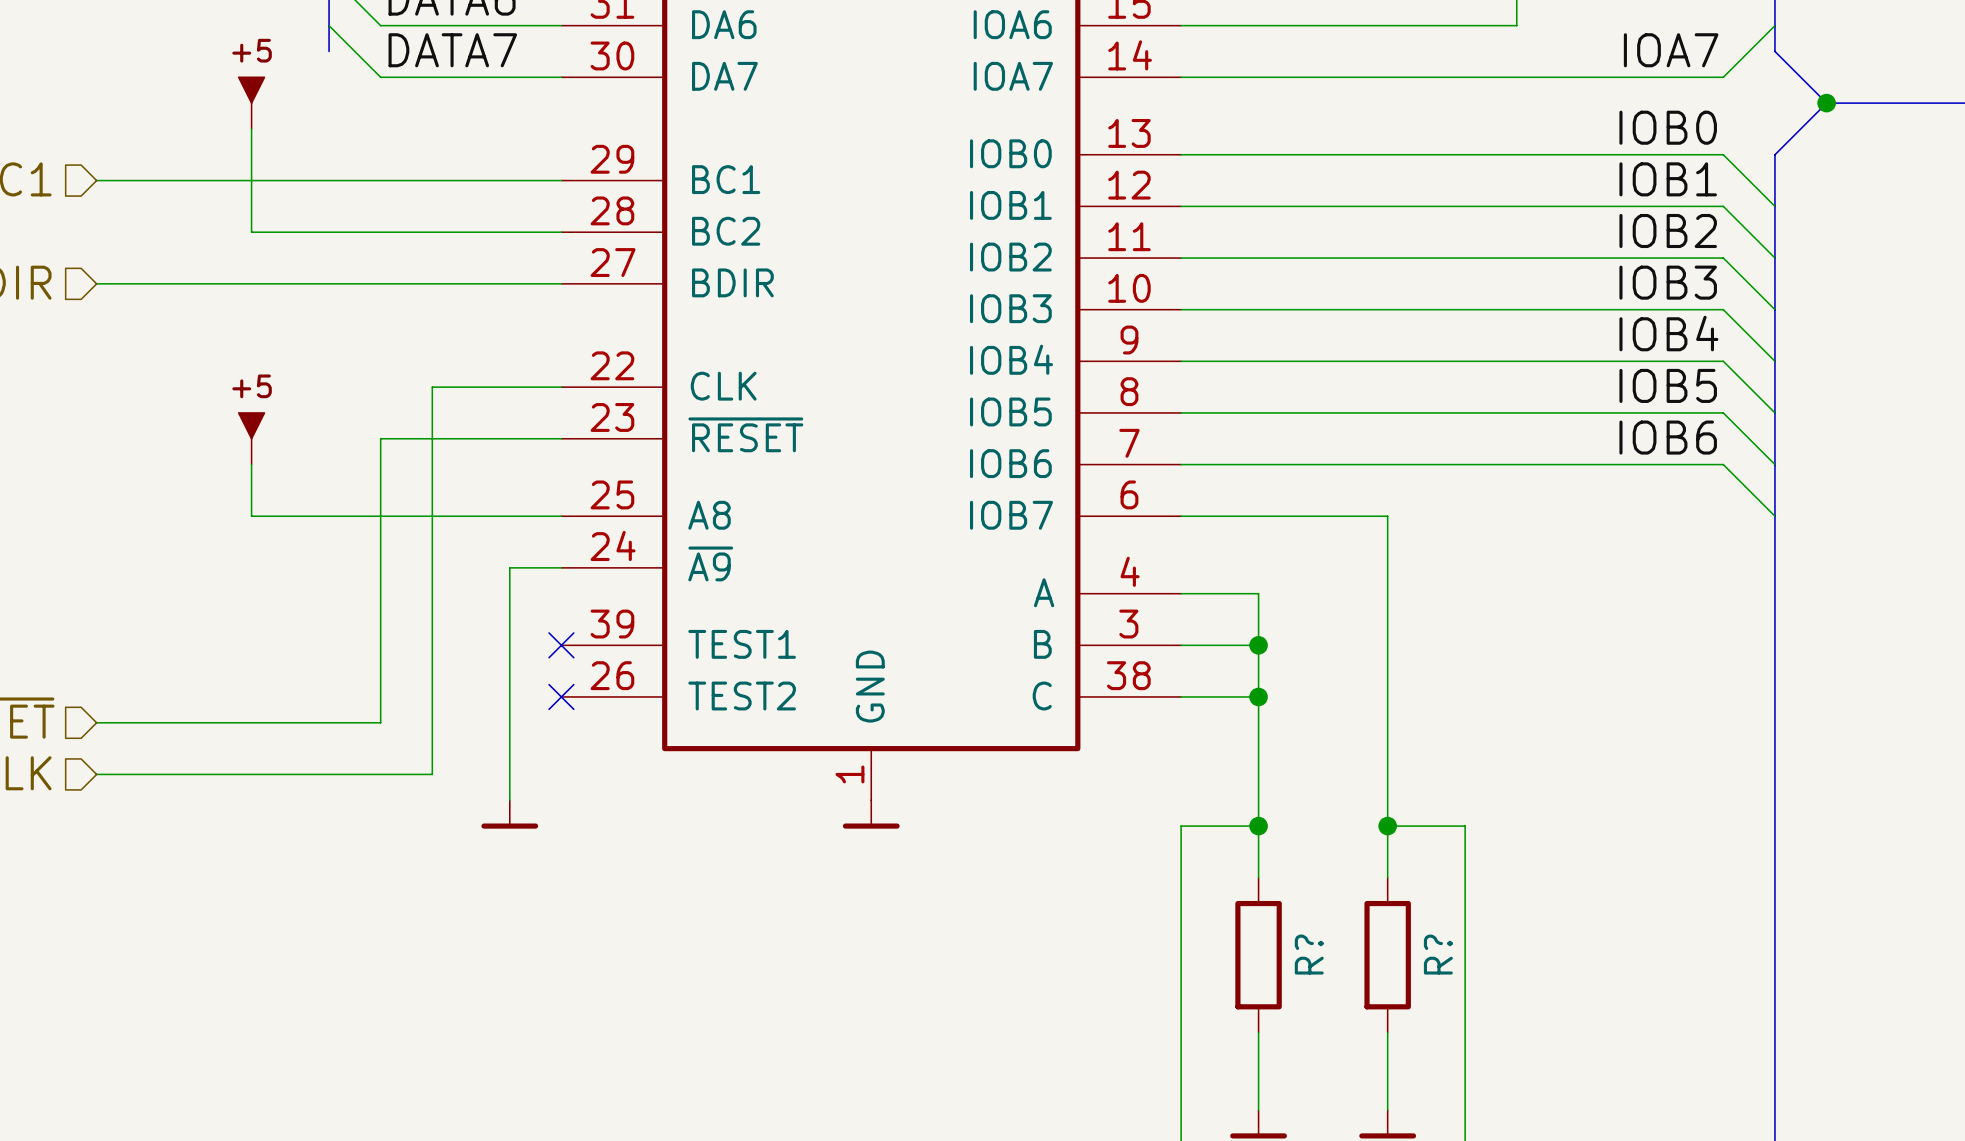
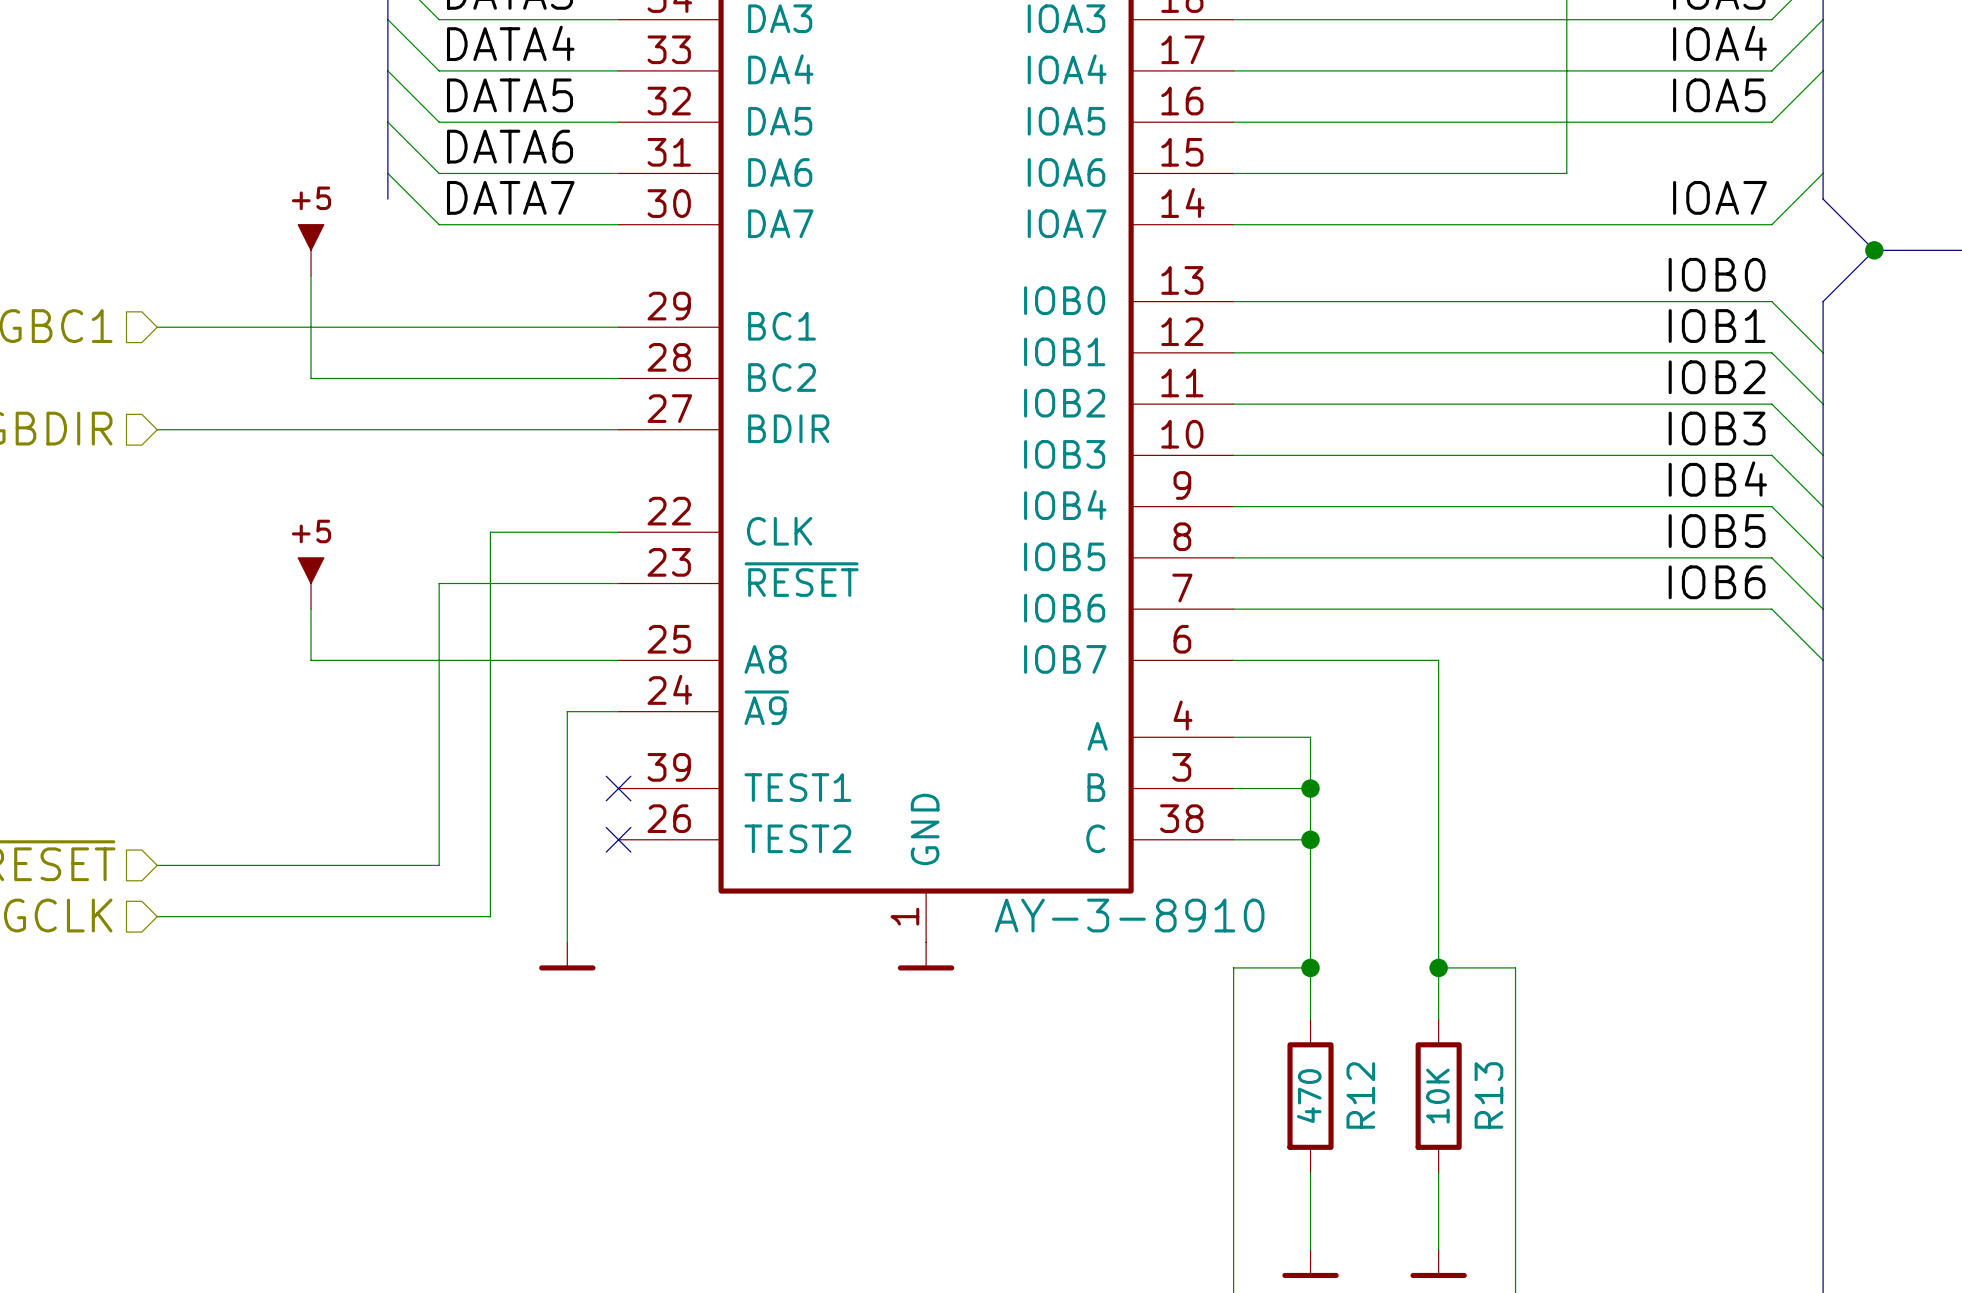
part value: none -> AY-3-8910 (1129, 915)
R? name: R? (1309, 954) -> R12 (1360, 1095)
R? name: R? (1438, 954) -> R13 (1488, 1095)
R? value: none -> 470 (1309, 1096)
R? value: none -> 10K (1437, 1096)

